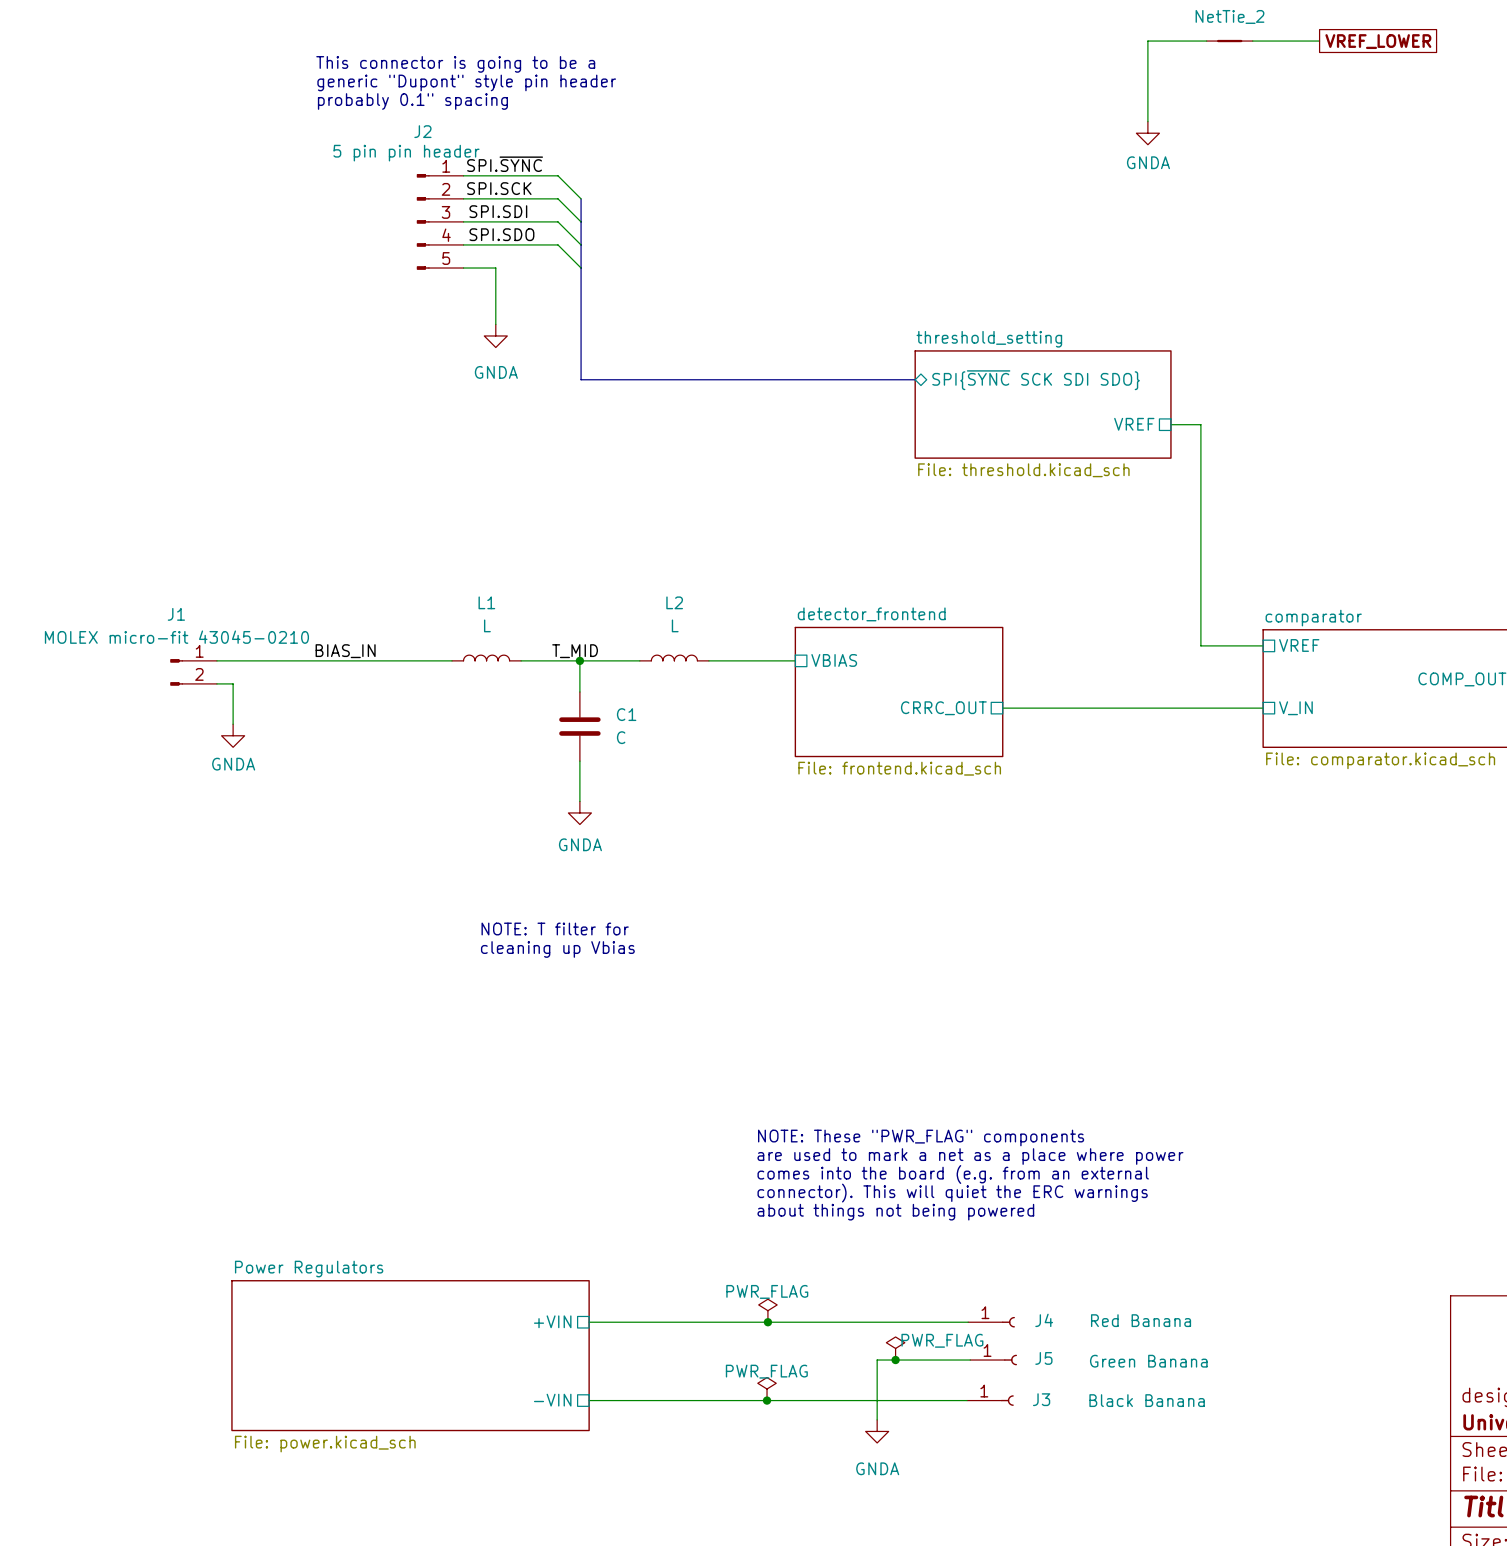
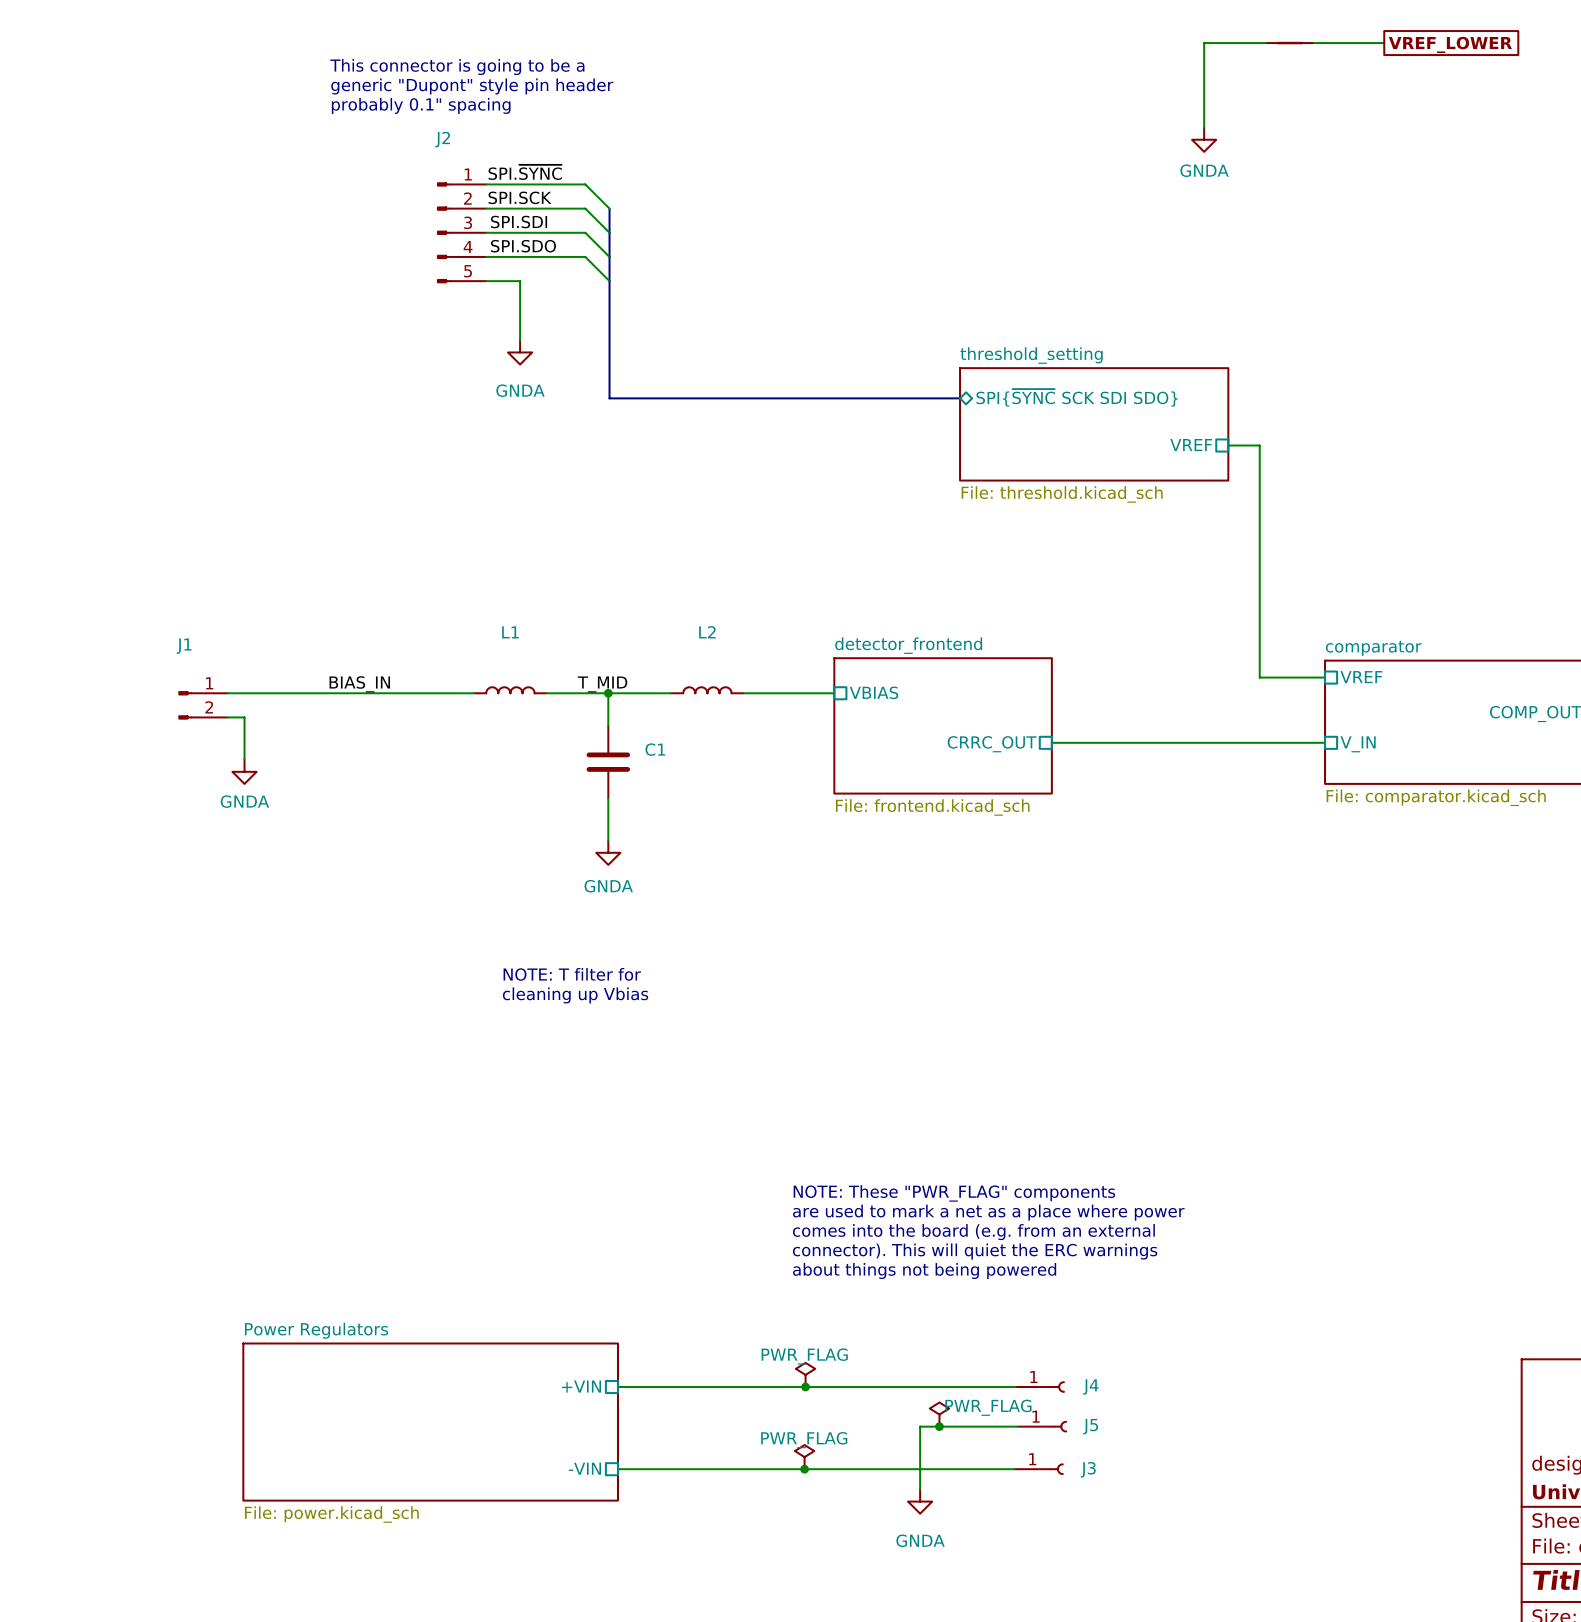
part value: NetTie_2 (1229, 16) -> none
J2 value: 5 pin pin header (406, 153) -> none
L1 value: L (487, 625) -> none
L2 value: L (675, 625) -> none
J1 value: MOLEX micro-fit 43045-0210 (176, 637) -> none
C1 value: C (621, 737) -> none
J4 value: Red Banana (1141, 1320) -> none
J5 value: Green Banana (1148, 1361) -> none
J3 value: Black Banana (1147, 1400) -> none

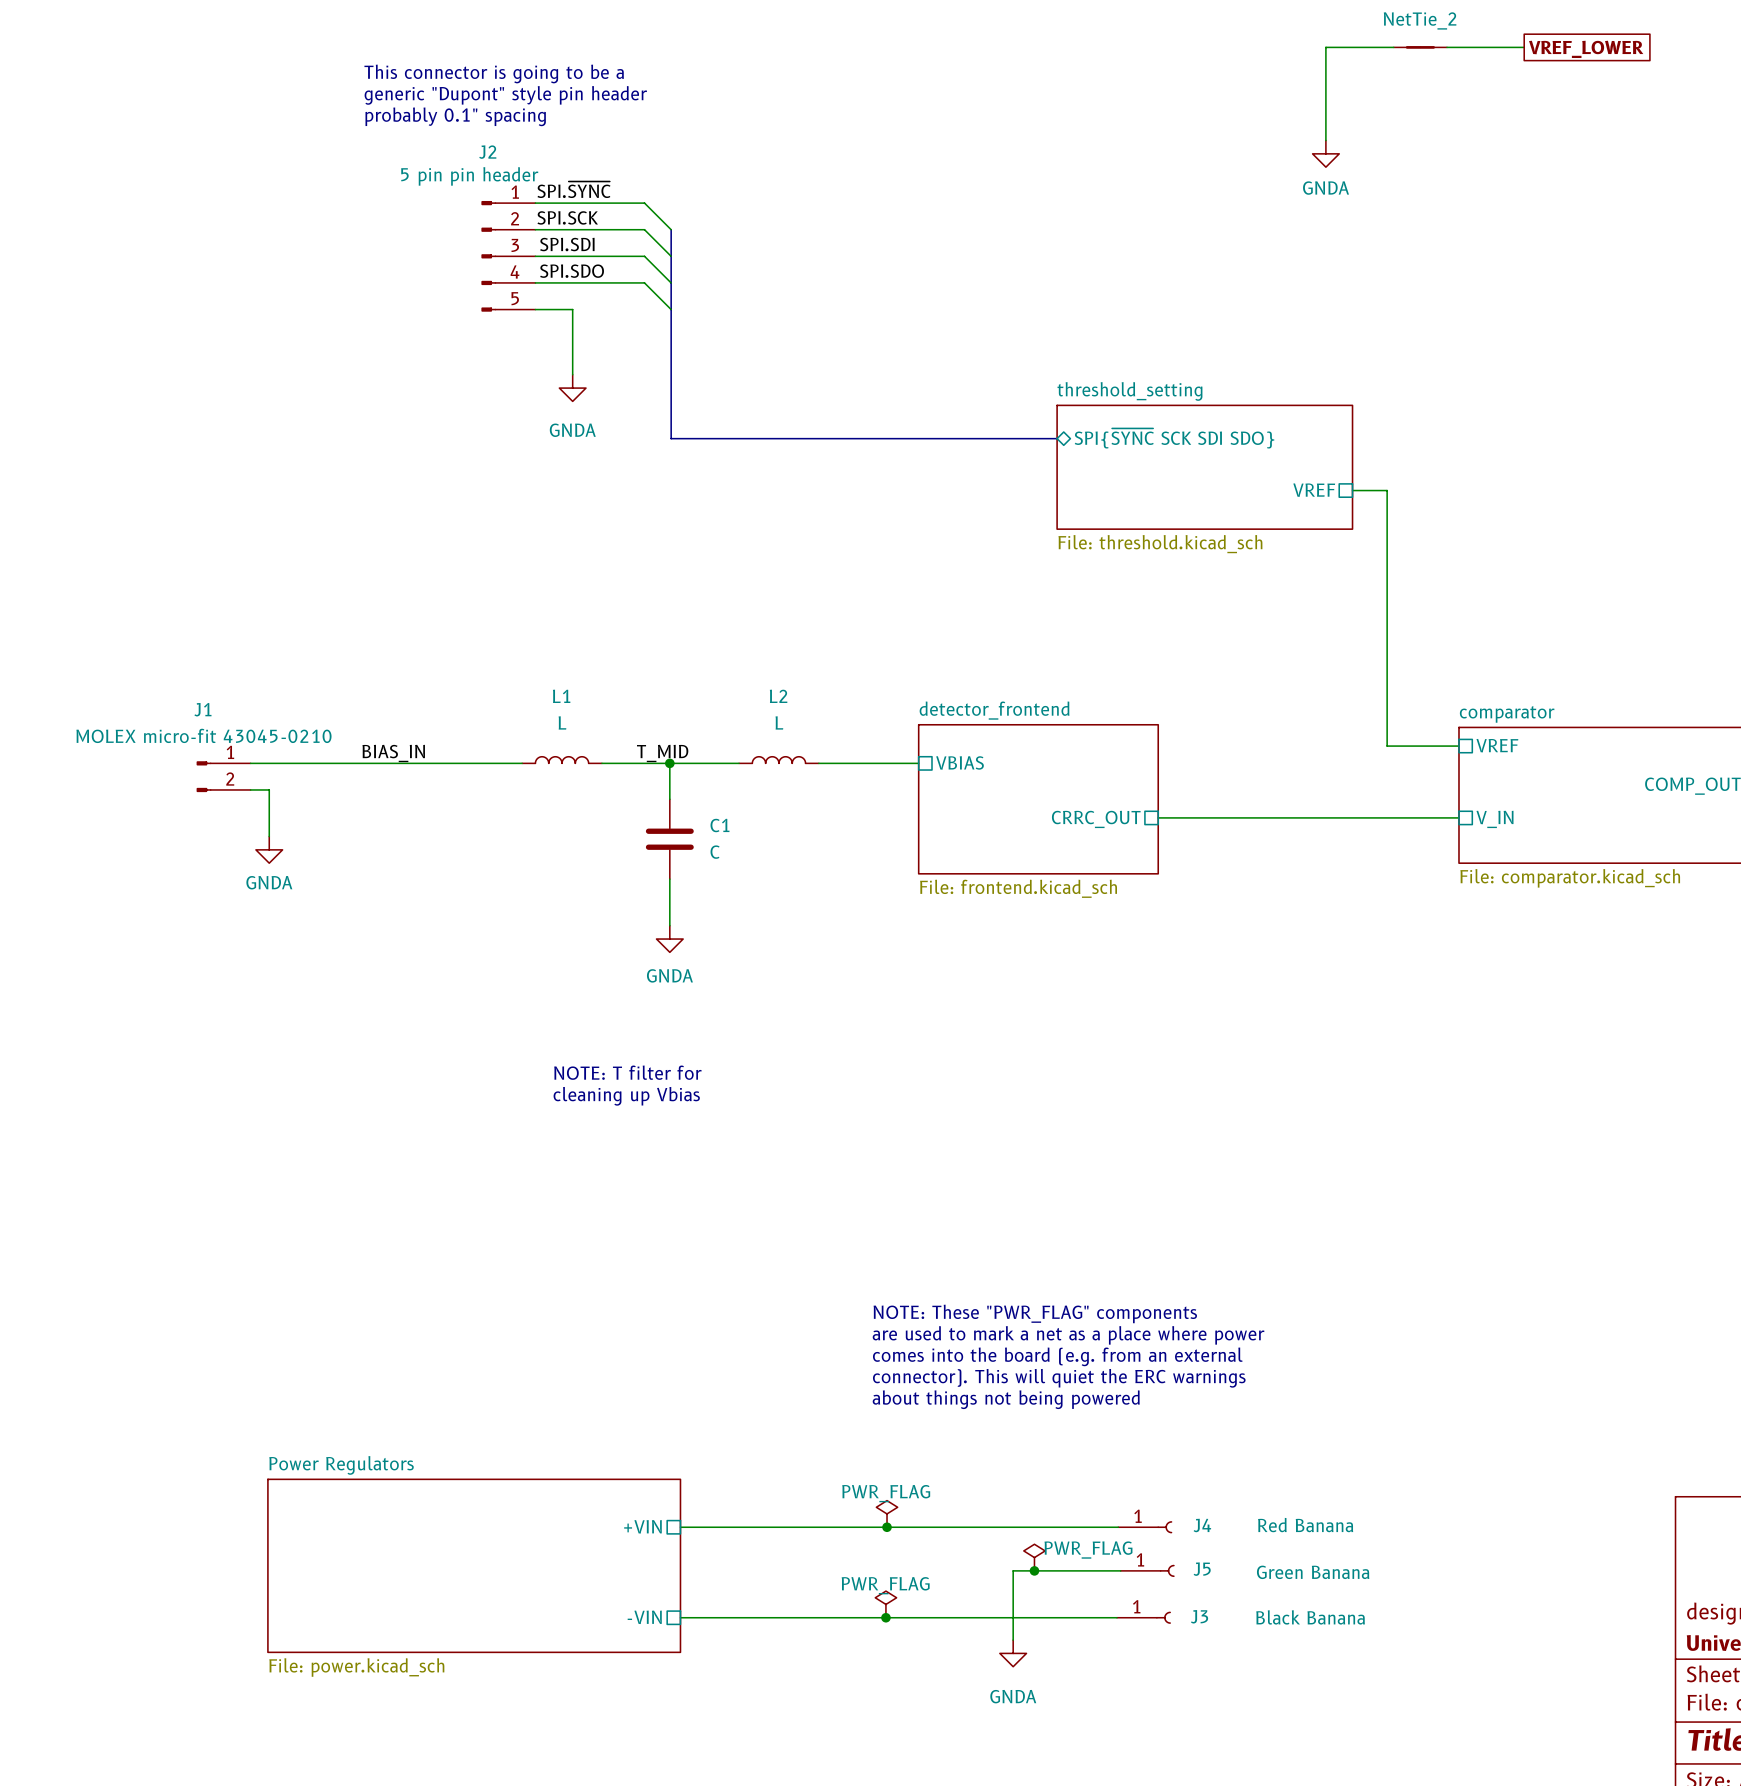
part value: none -> NetTie_2 (1420, 20)
J2 value: none -> 5 pin pin header (469, 176)
L1 value: none -> L (562, 722)
L2 value: none -> L (779, 722)
J1 value: none -> MOLEX micro-fit 43045-0210 (203, 735)
C1 value: none -> C (715, 852)
J4 value: none -> Red Banana (1305, 1525)
J5 value: none -> Green Banana (1313, 1572)
J3 value: none -> Black Banana (1310, 1617)

